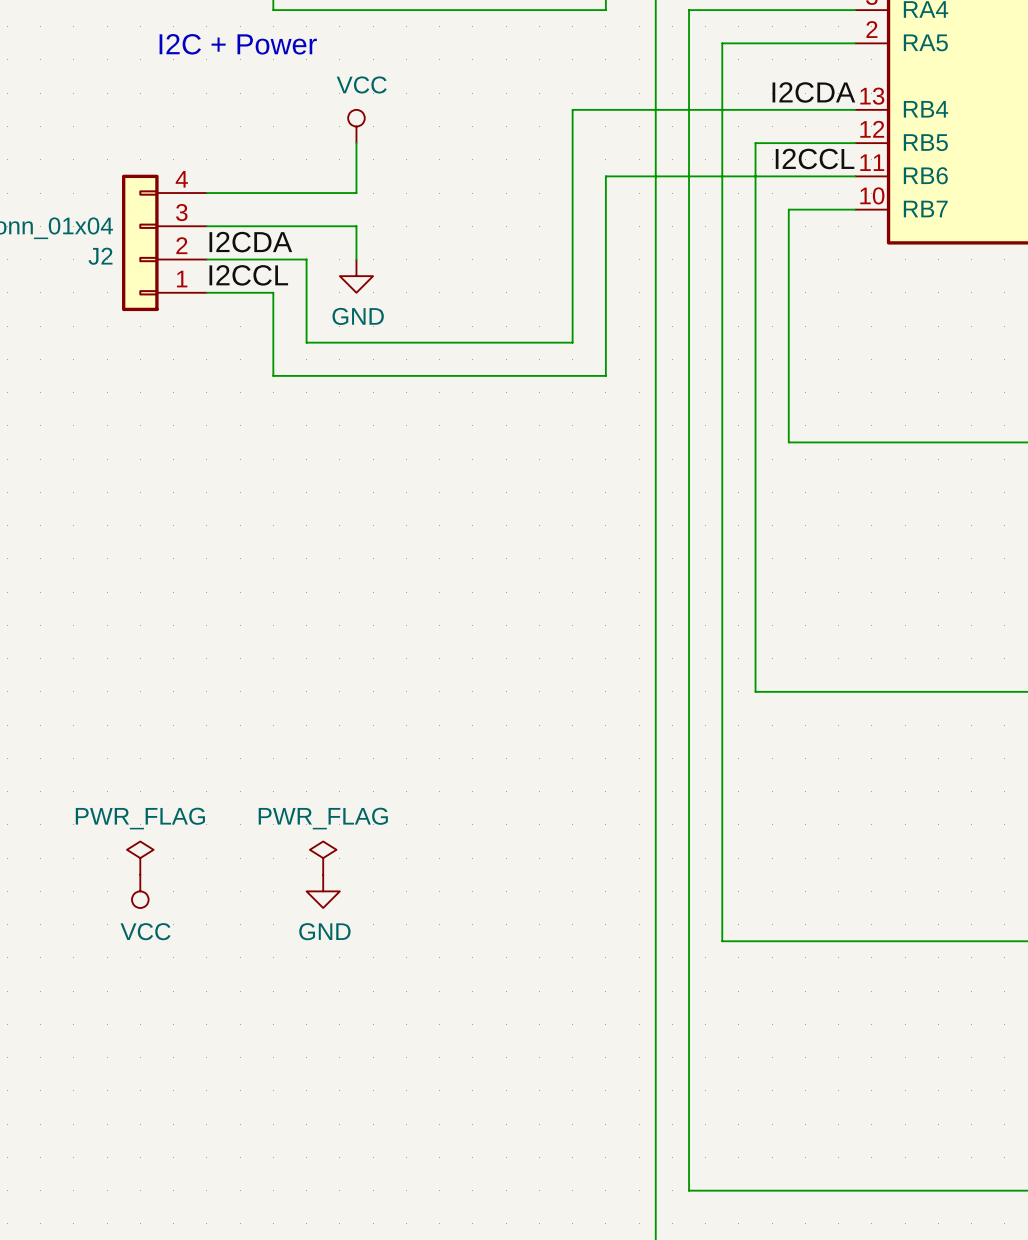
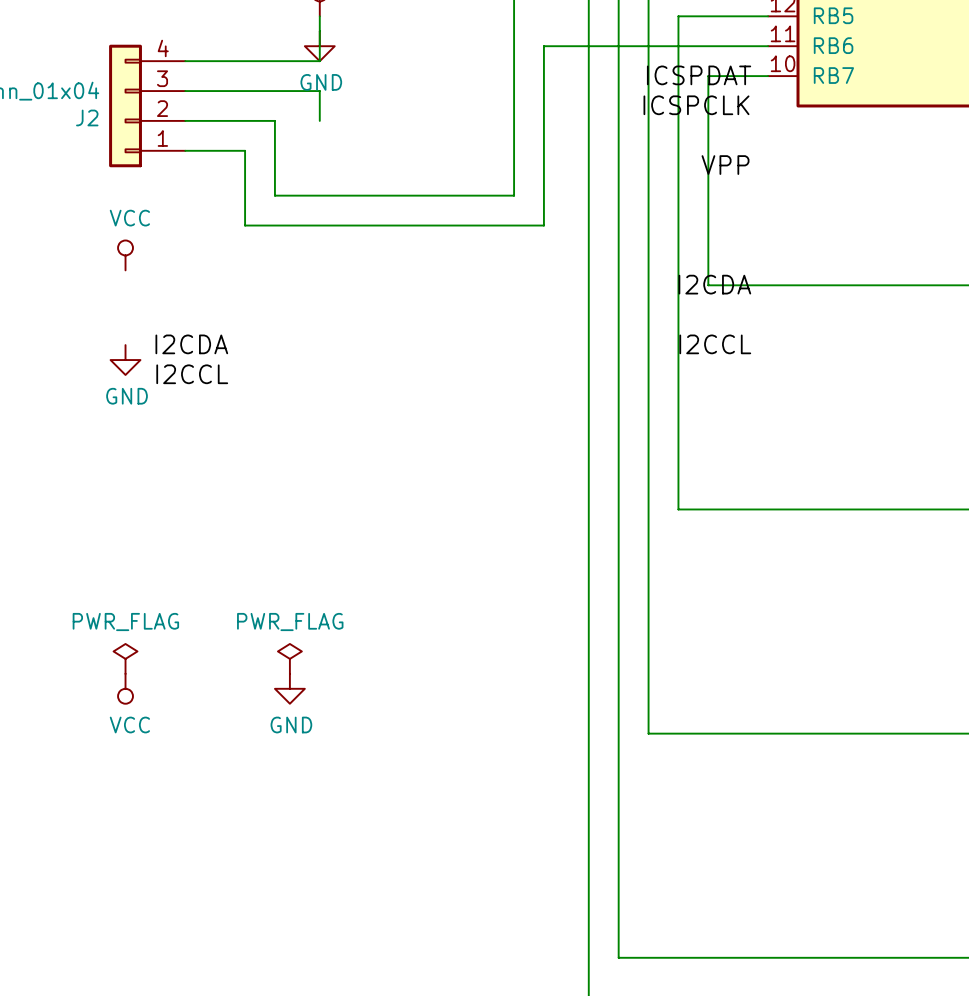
label: I2CCL (815, 158) -> none
label: none -> ICSPDAT (699, 75)
label position: I2CDA (250, 242) -> I2CDA (191, 344)
label: none -> ICSPCLK (696, 105)
label position: I2CCL (248, 275) -> I2CCL (192, 374)
power symbol position: GND (356, 276) -> GND (319, 46)
label: none -> VPP (725, 165)
power symbol: none -> VCC (125, 255)
label: none -> I2CDA (714, 284)
label: none -> I2CCL (715, 344)
power symbol: none -> GND (125, 360)

